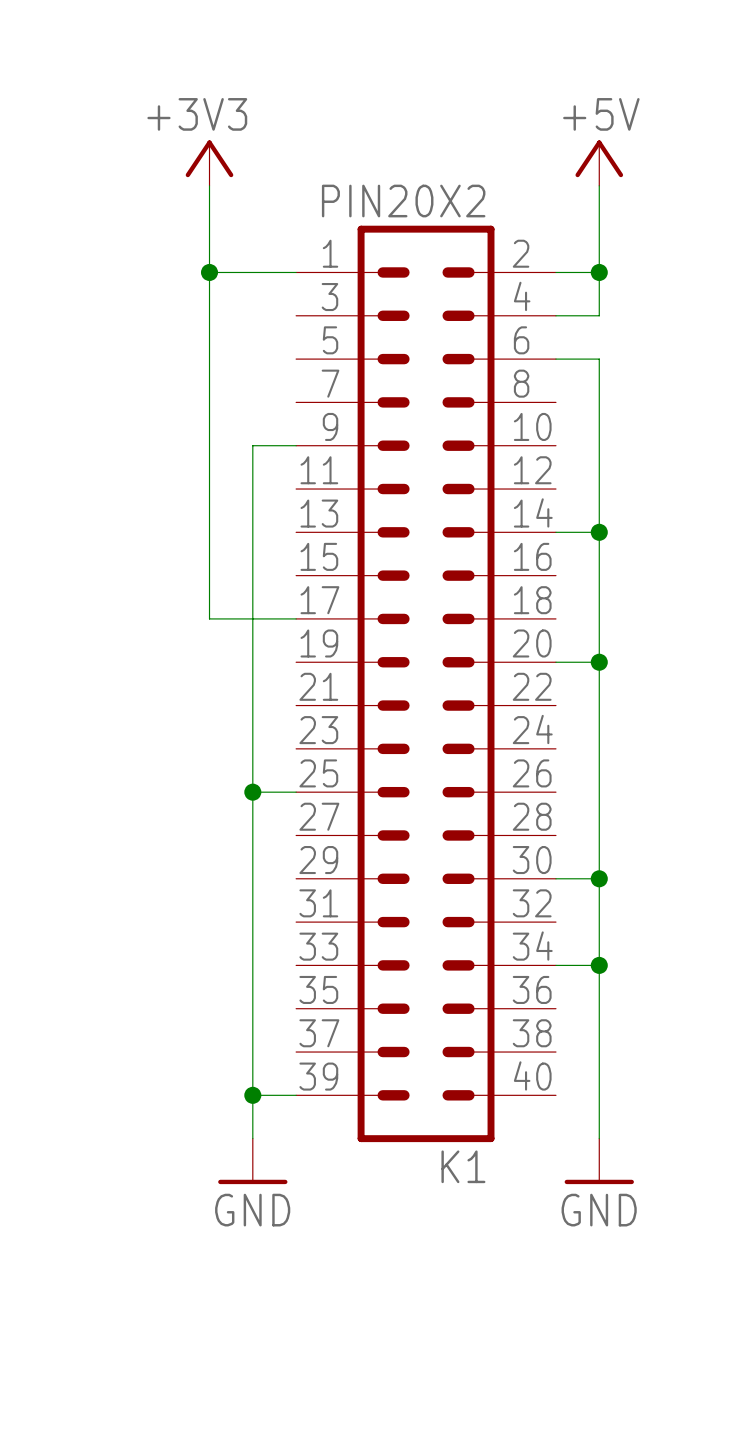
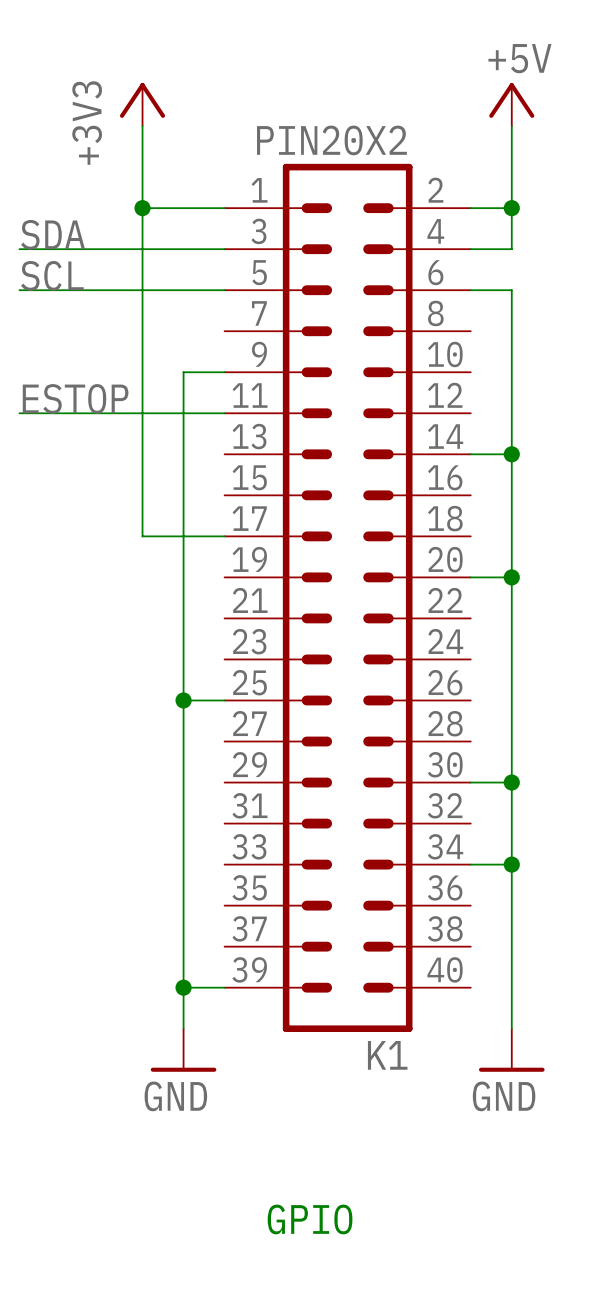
power symbol text rotation: 0° (197, 114) -> 90° counterclockwise (87, 123)
label: none -> SDA (53, 234)
wire: none -> (19, 249) (224, 249)
label: none -> SCL (52, 275)
wire: none -> (19, 290) (224, 290)
label: none -> ESTOP (75, 398)
wire: none -> (19, 413) (224, 413)
text: none -> GPIO (310, 1219)

